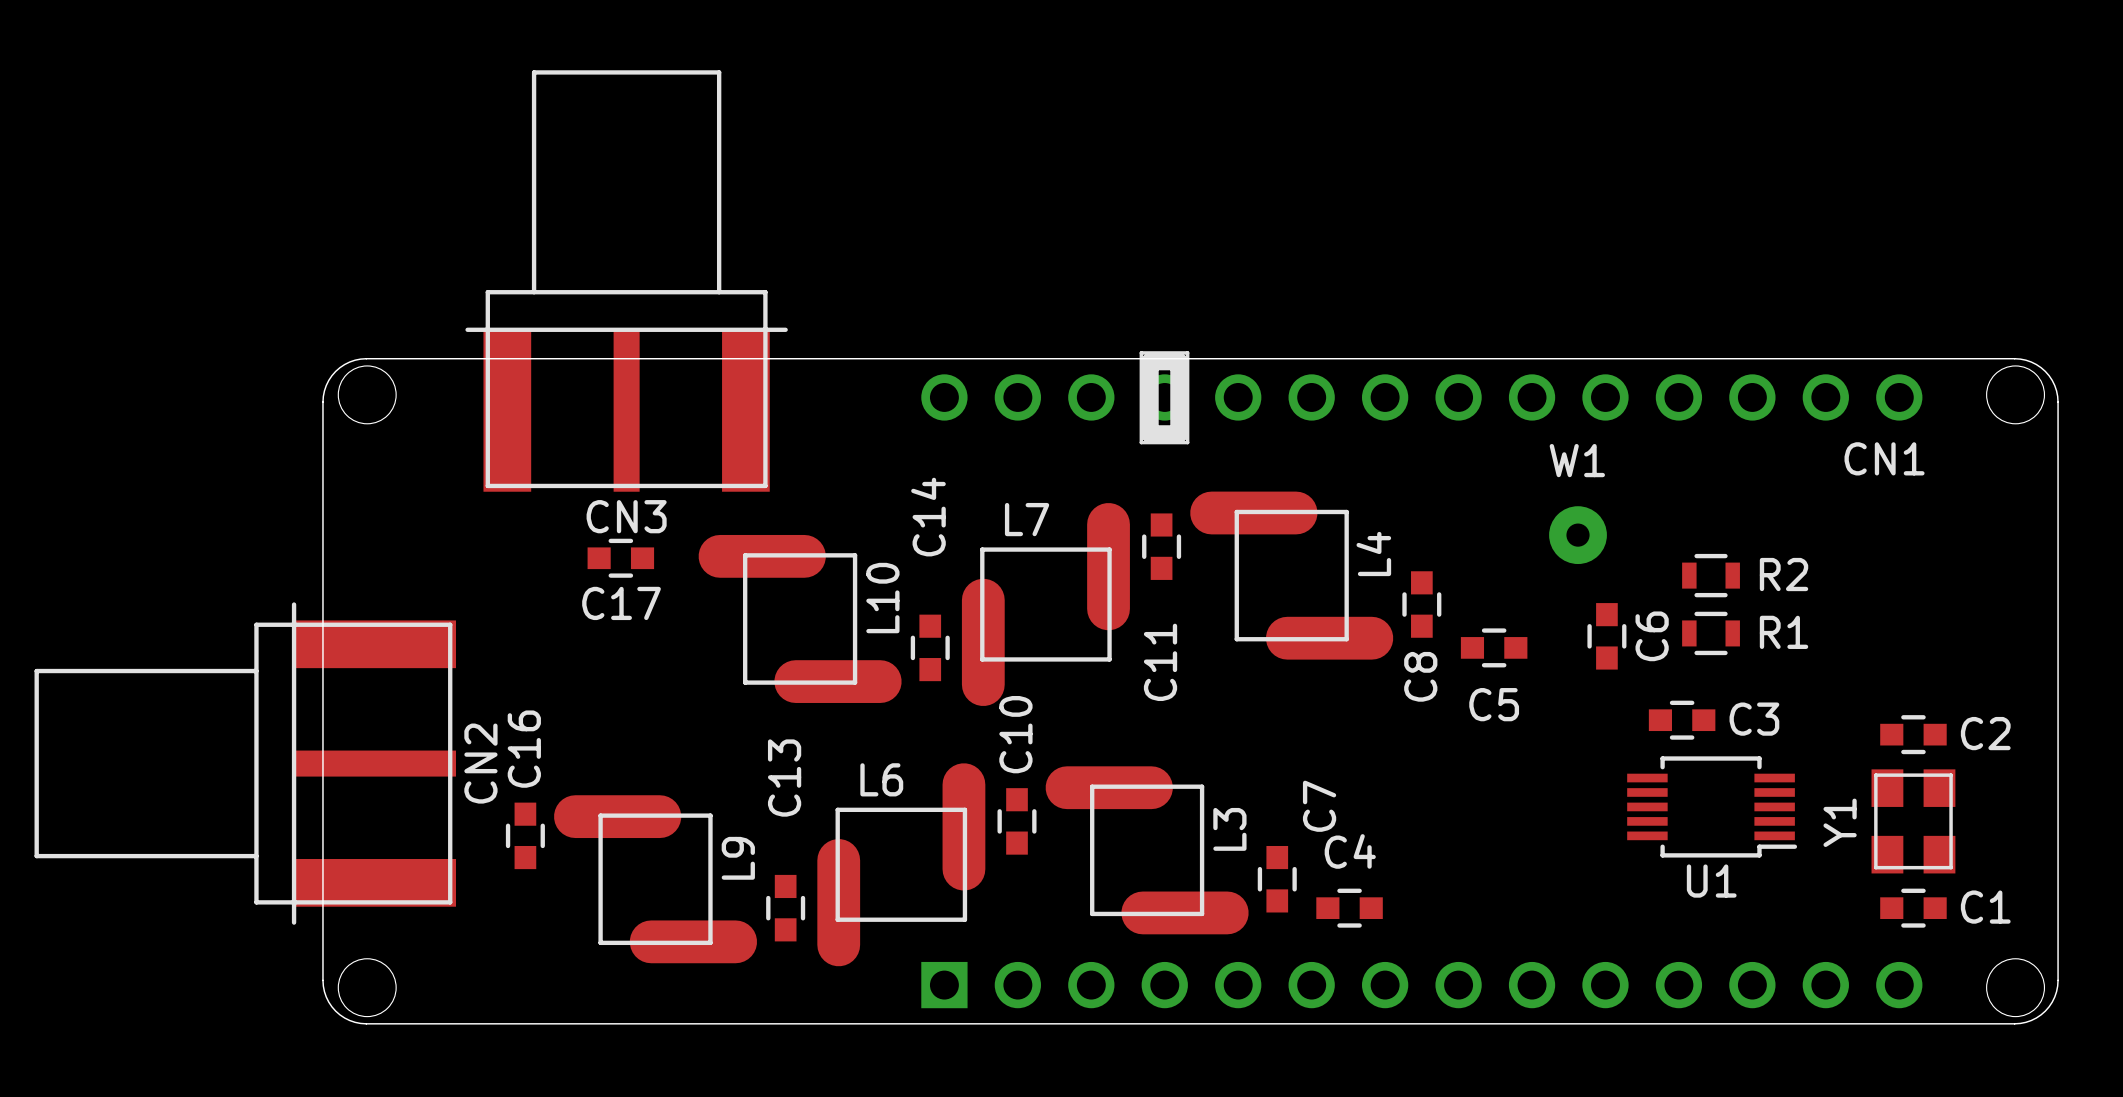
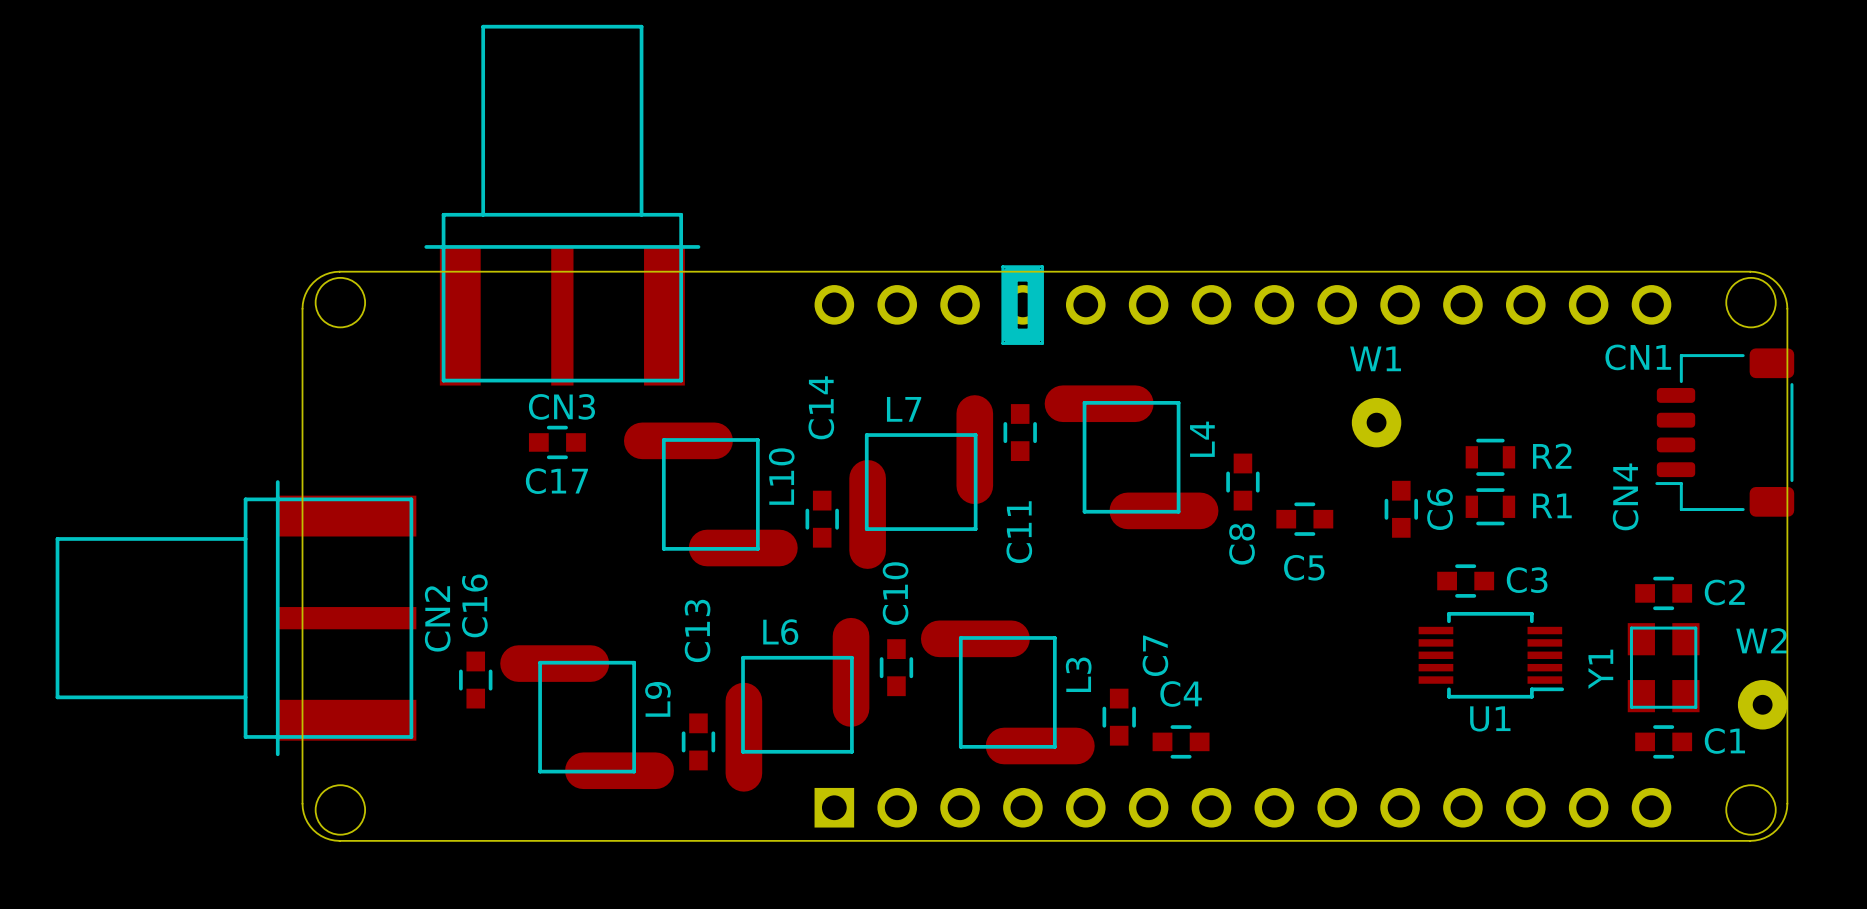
CN4: none -> (1724, 432)
W2: none -> (1762, 704)

